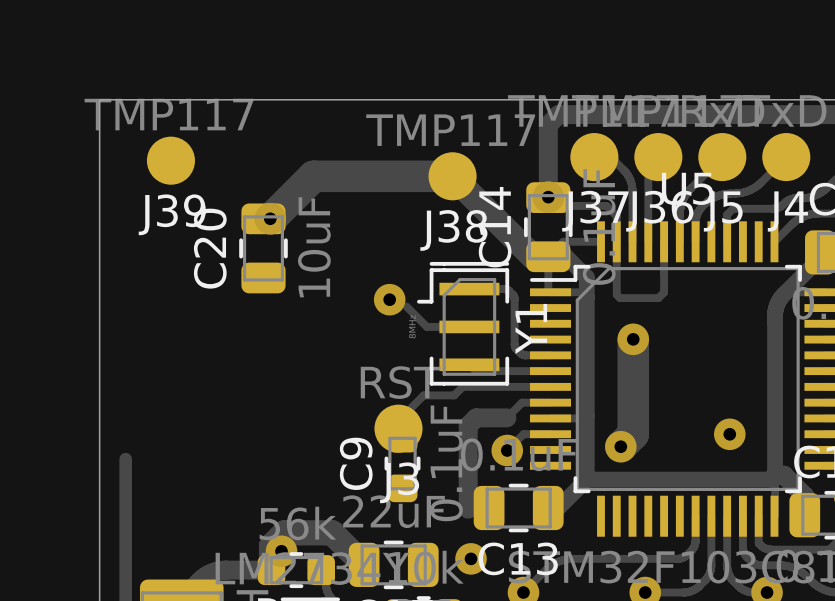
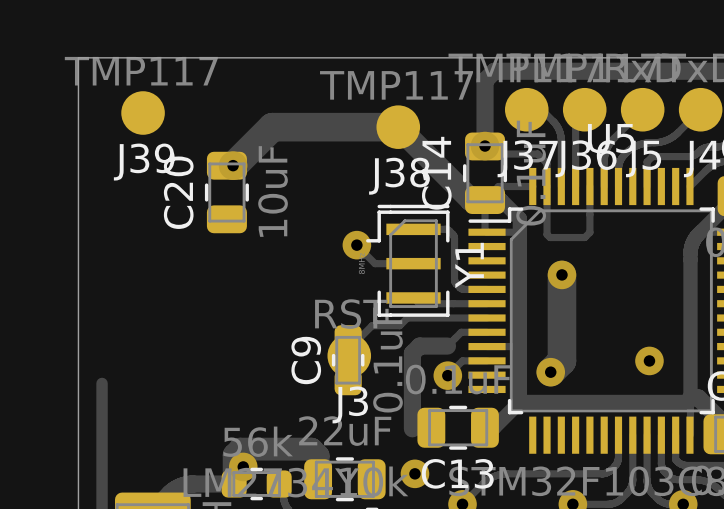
via position: (389, 299) -> (356, 245)
C9 position: (402, 463) -> (348, 360)
track: (271, 546) (284, 532) (332, 532) (364, 564) -> (234, 462) (234, 454) (239, 449) (311, 449) (318, 455) (318, 479)

